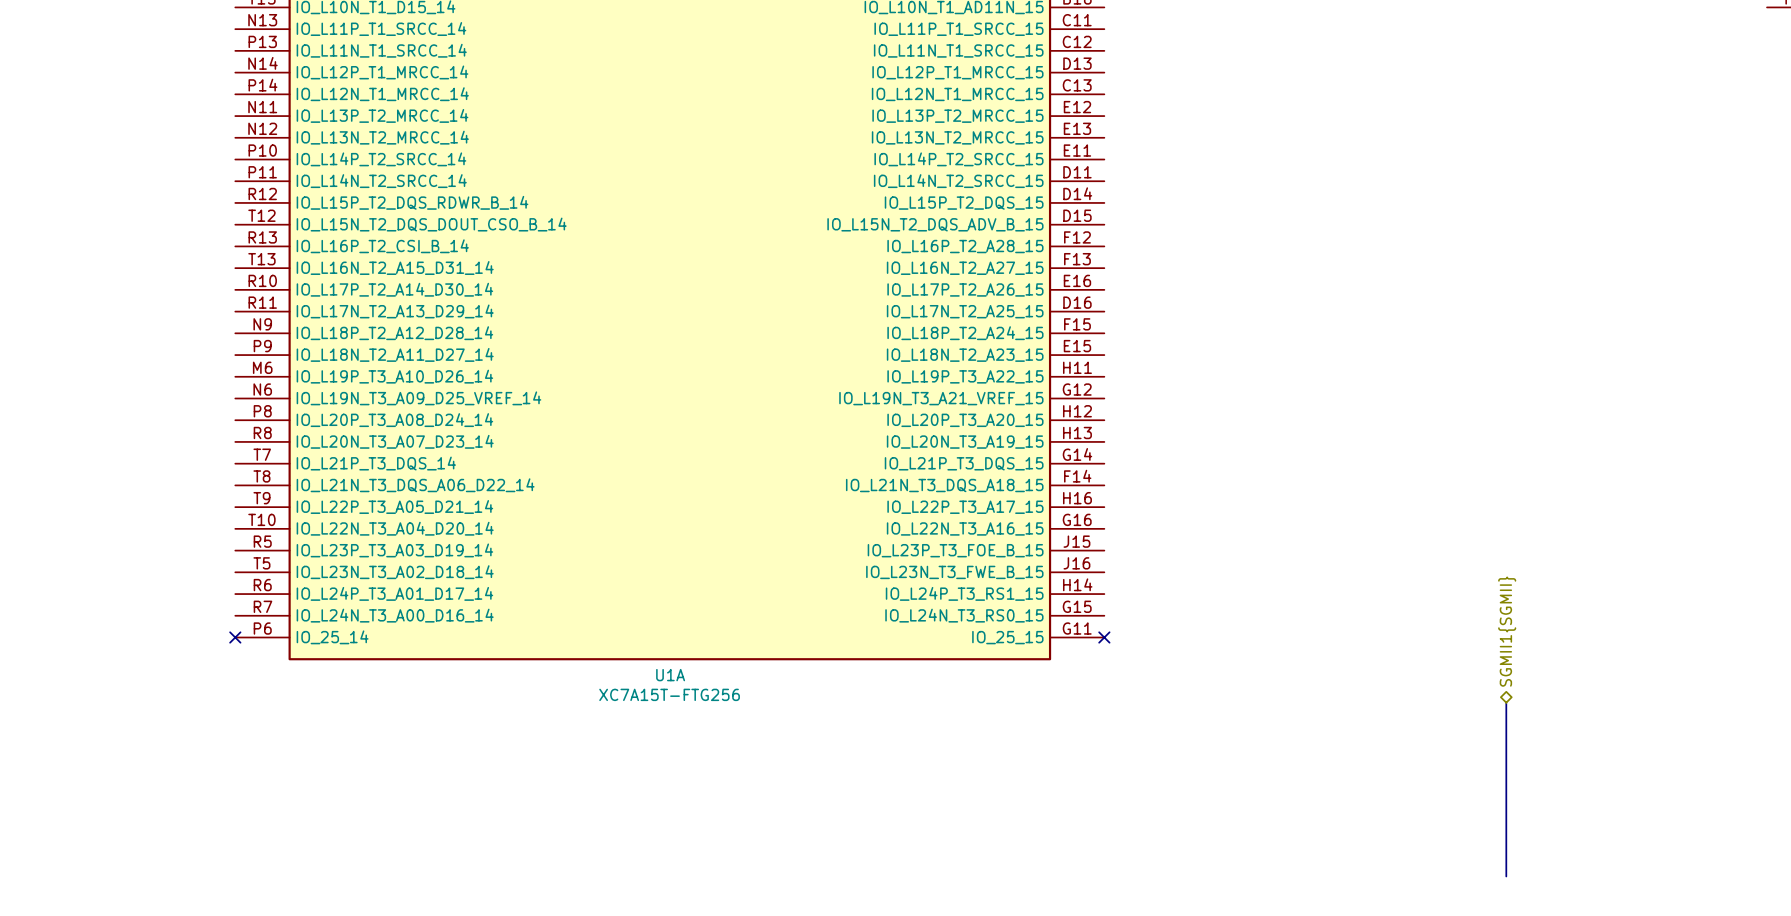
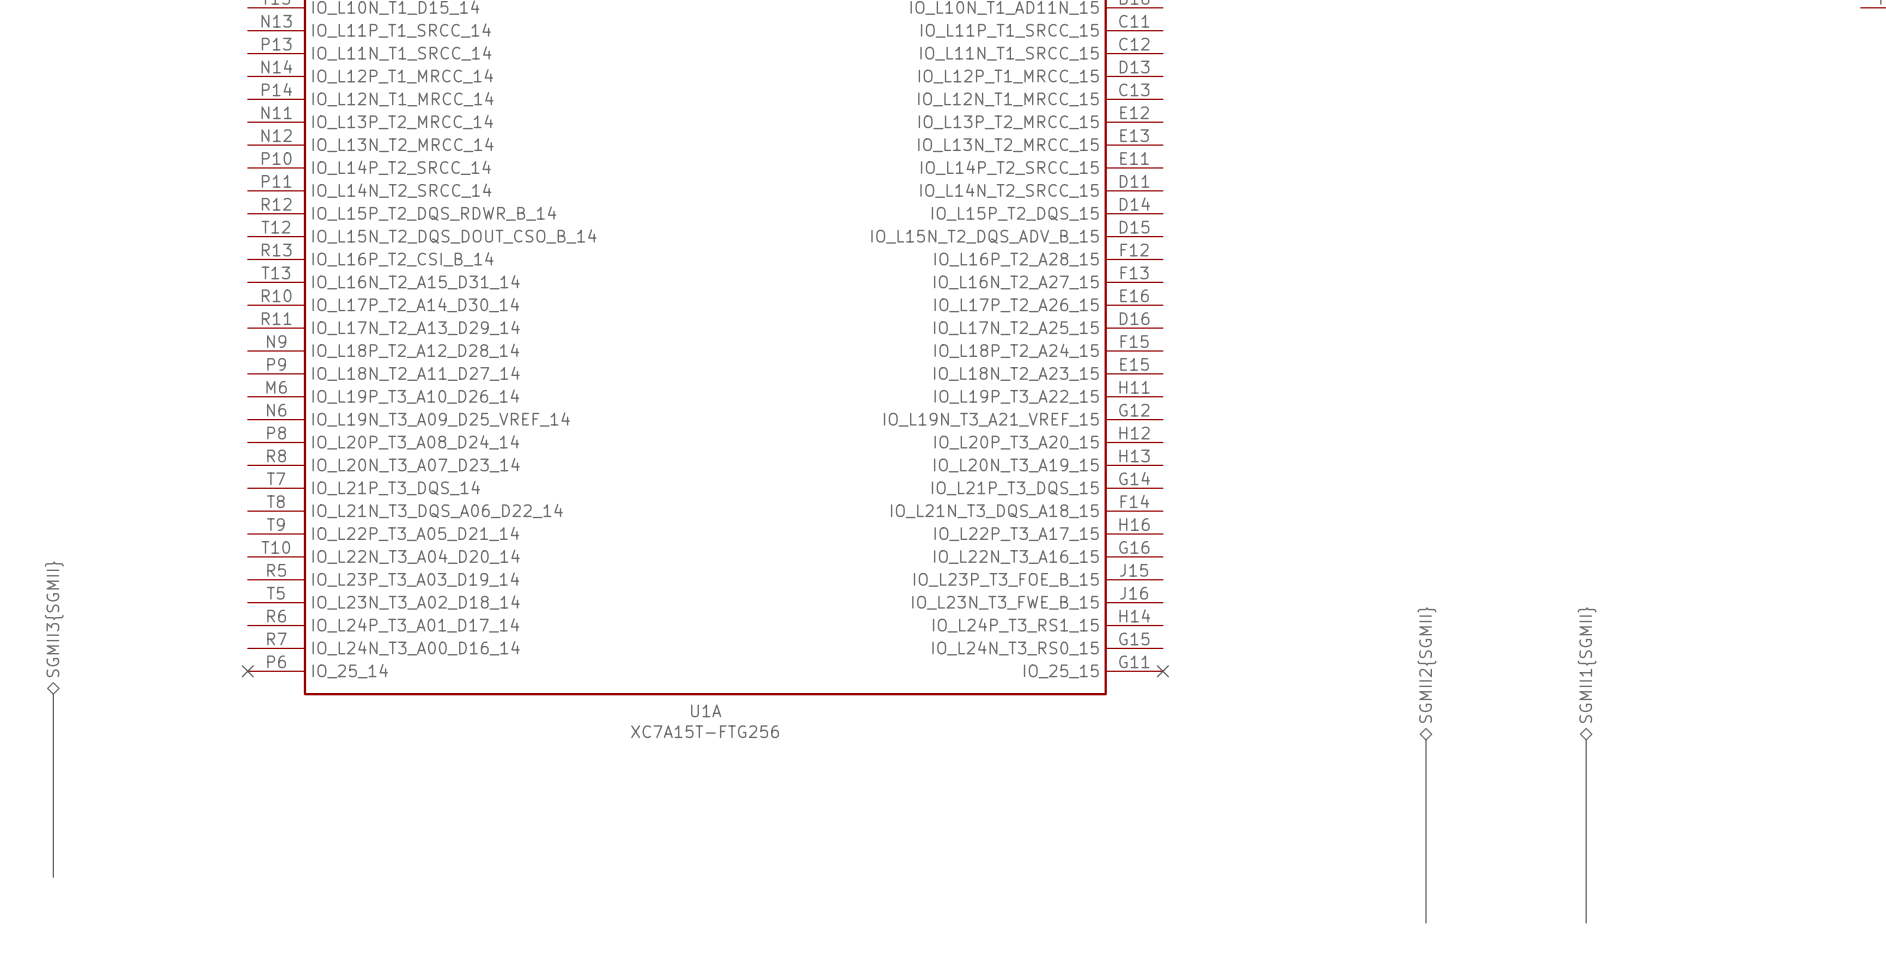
hierarchical label: none -> SGMII3{SGMII} (54, 619)
hierarchical label: none -> SGMII2{SGMII} (1426, 665)
bus: none -> (53, 694) (53, 877)
bus: none -> (1426, 739) (1426, 922)

